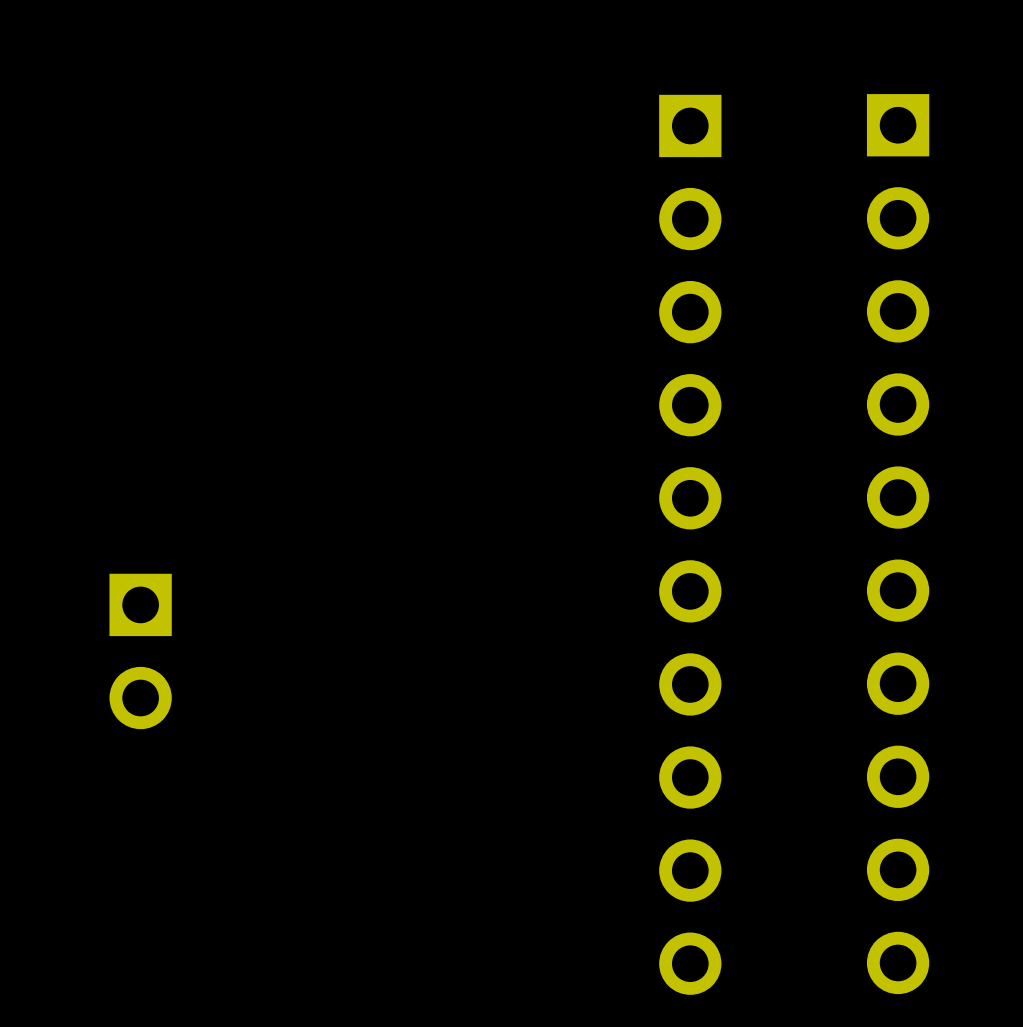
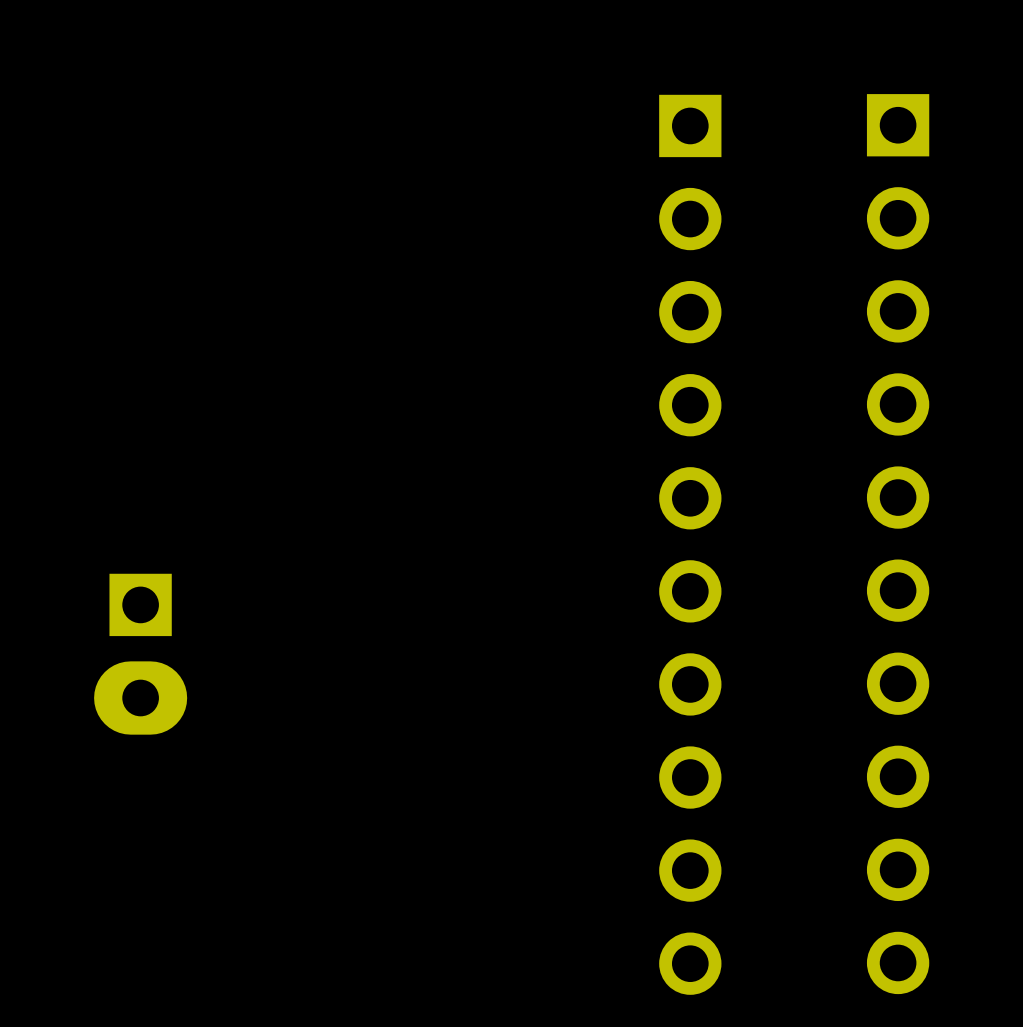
part footprint: [109, 573, 172, 730] -> [94, 573, 188, 735]

